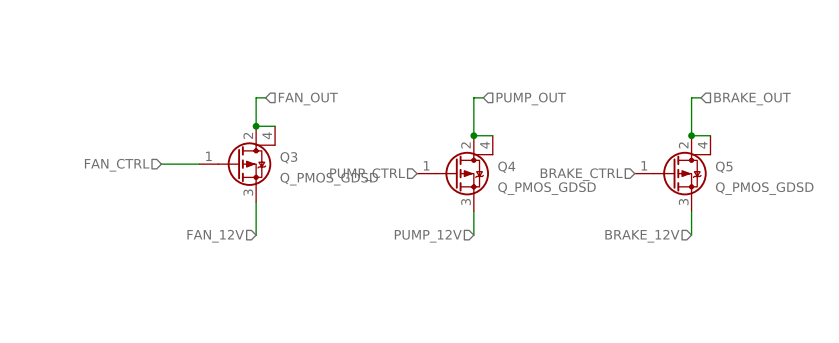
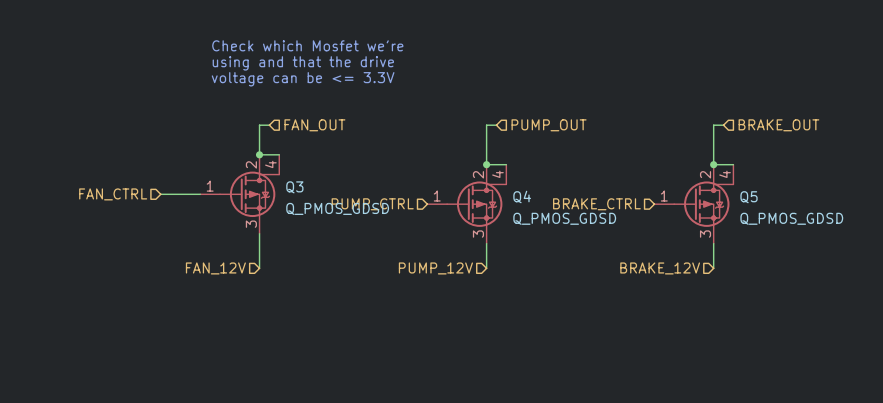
text: none -> Check which Mosfet we're (307, 45)
text: none -> using and that the drive (303, 63)
text: none -> voltage can be <= 3.3V (303, 79)

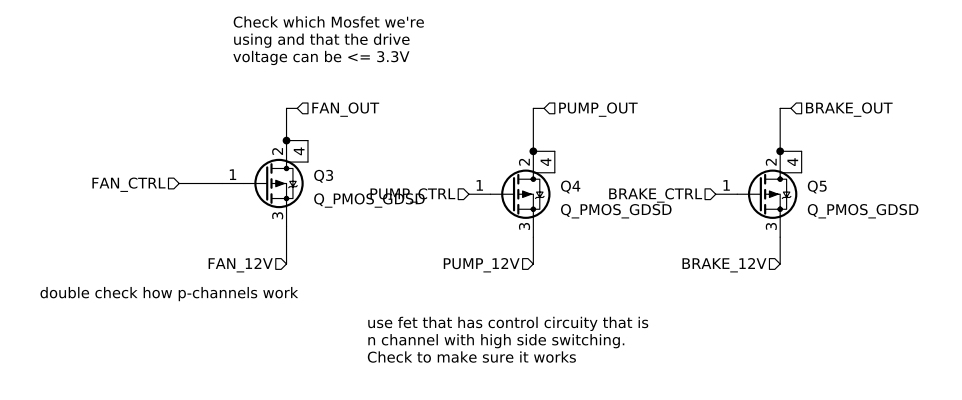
text: none -> double check how p-channels work (169, 294)
text: none -> use fet that has control circuity that is (508, 323)
text: none -> n channel with high side switching. (496, 341)
text: none -> Check to make sure it works (471, 357)

